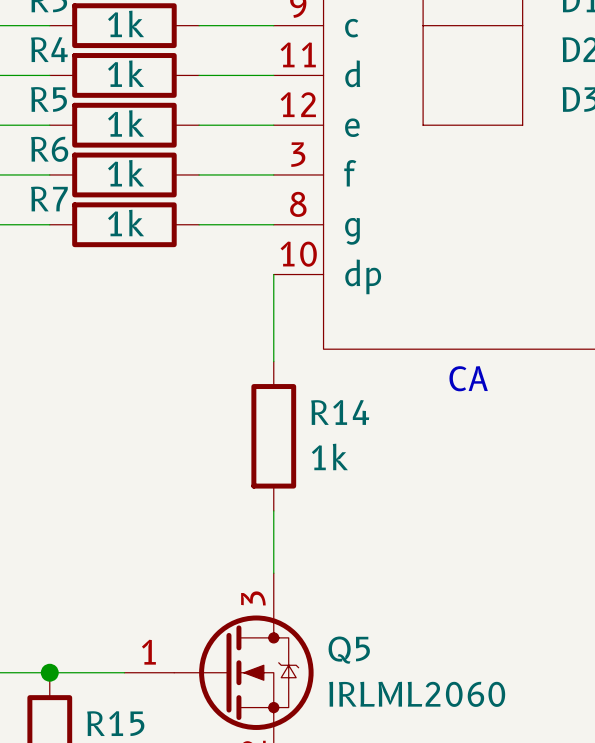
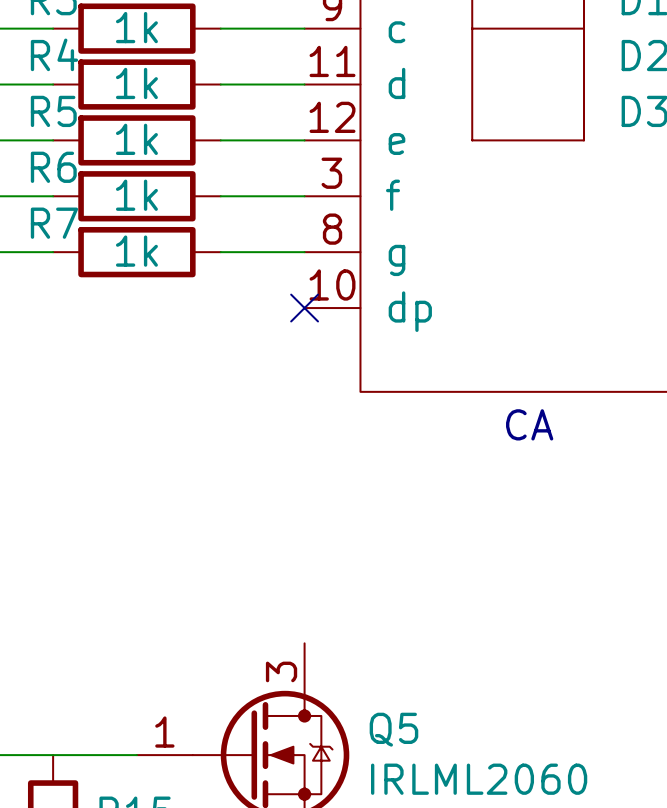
wire: (273, 274) (273, 361) -> none
no-connect mark: none -> (304, 308)
R14: 1k (273, 436) -> none
wire: (273, 510) (273, 573) -> none
junction: (49, 672) -> none

